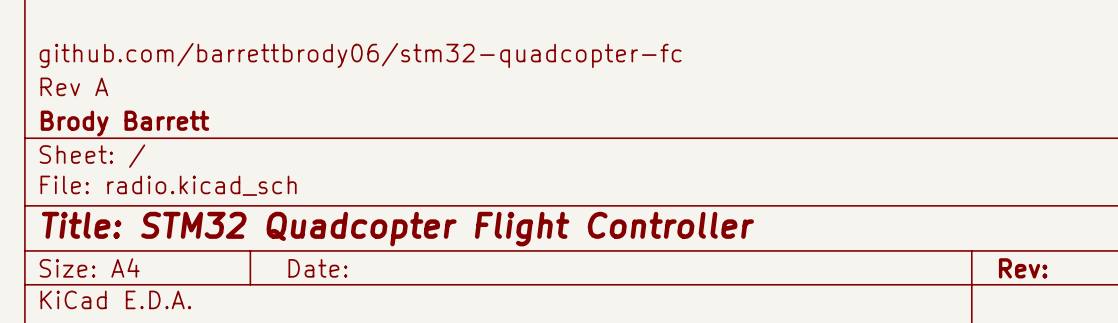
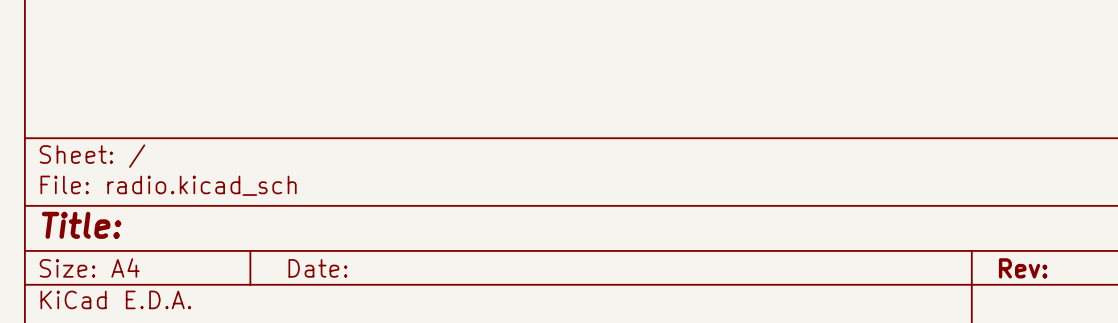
title block: github.com/barrettbrody06/stm32-quadcopter-fc (360, 55) -> none
title block: Rev A (74, 86) -> none
title block: Brody Barrett (124, 123) -> none
title block: Title: STM32 Quadcopter Flight Controller (397, 229) -> Title: (81, 225)

